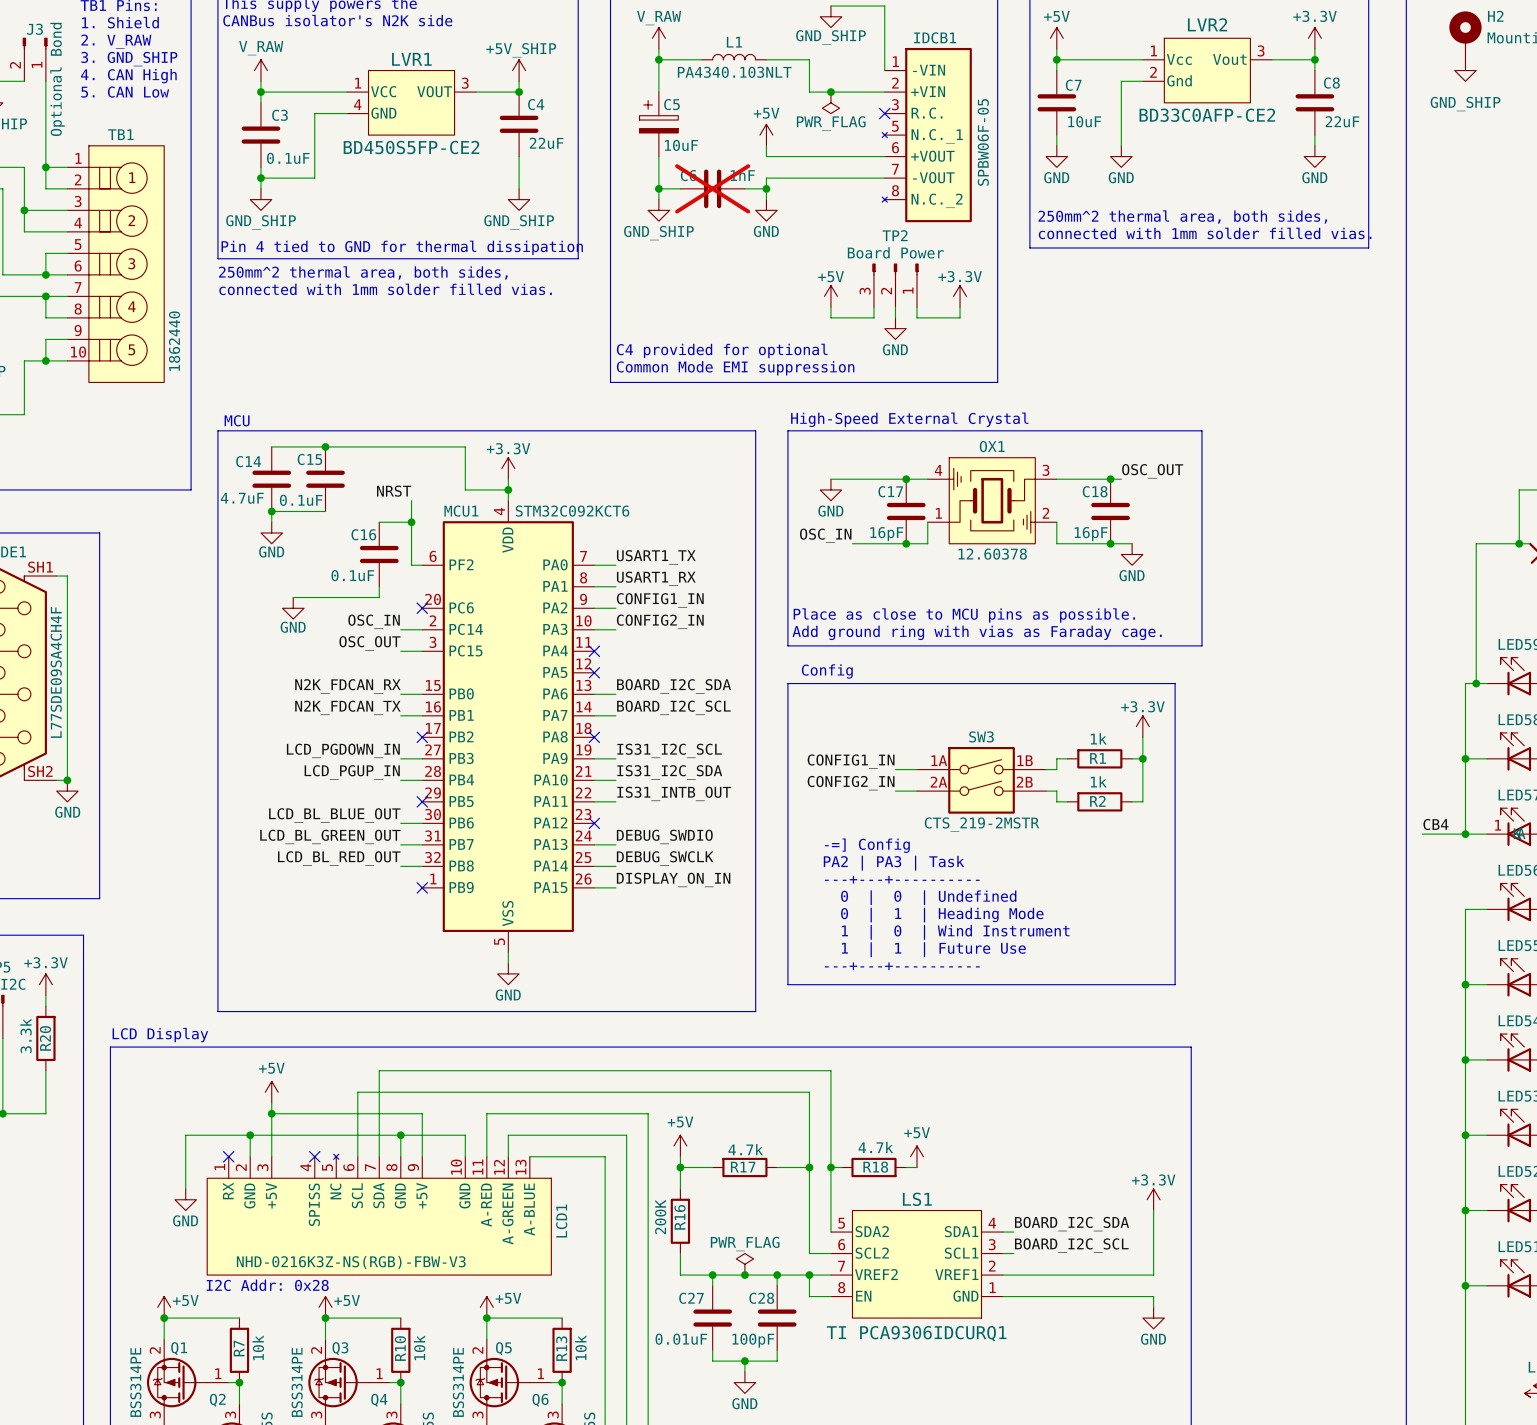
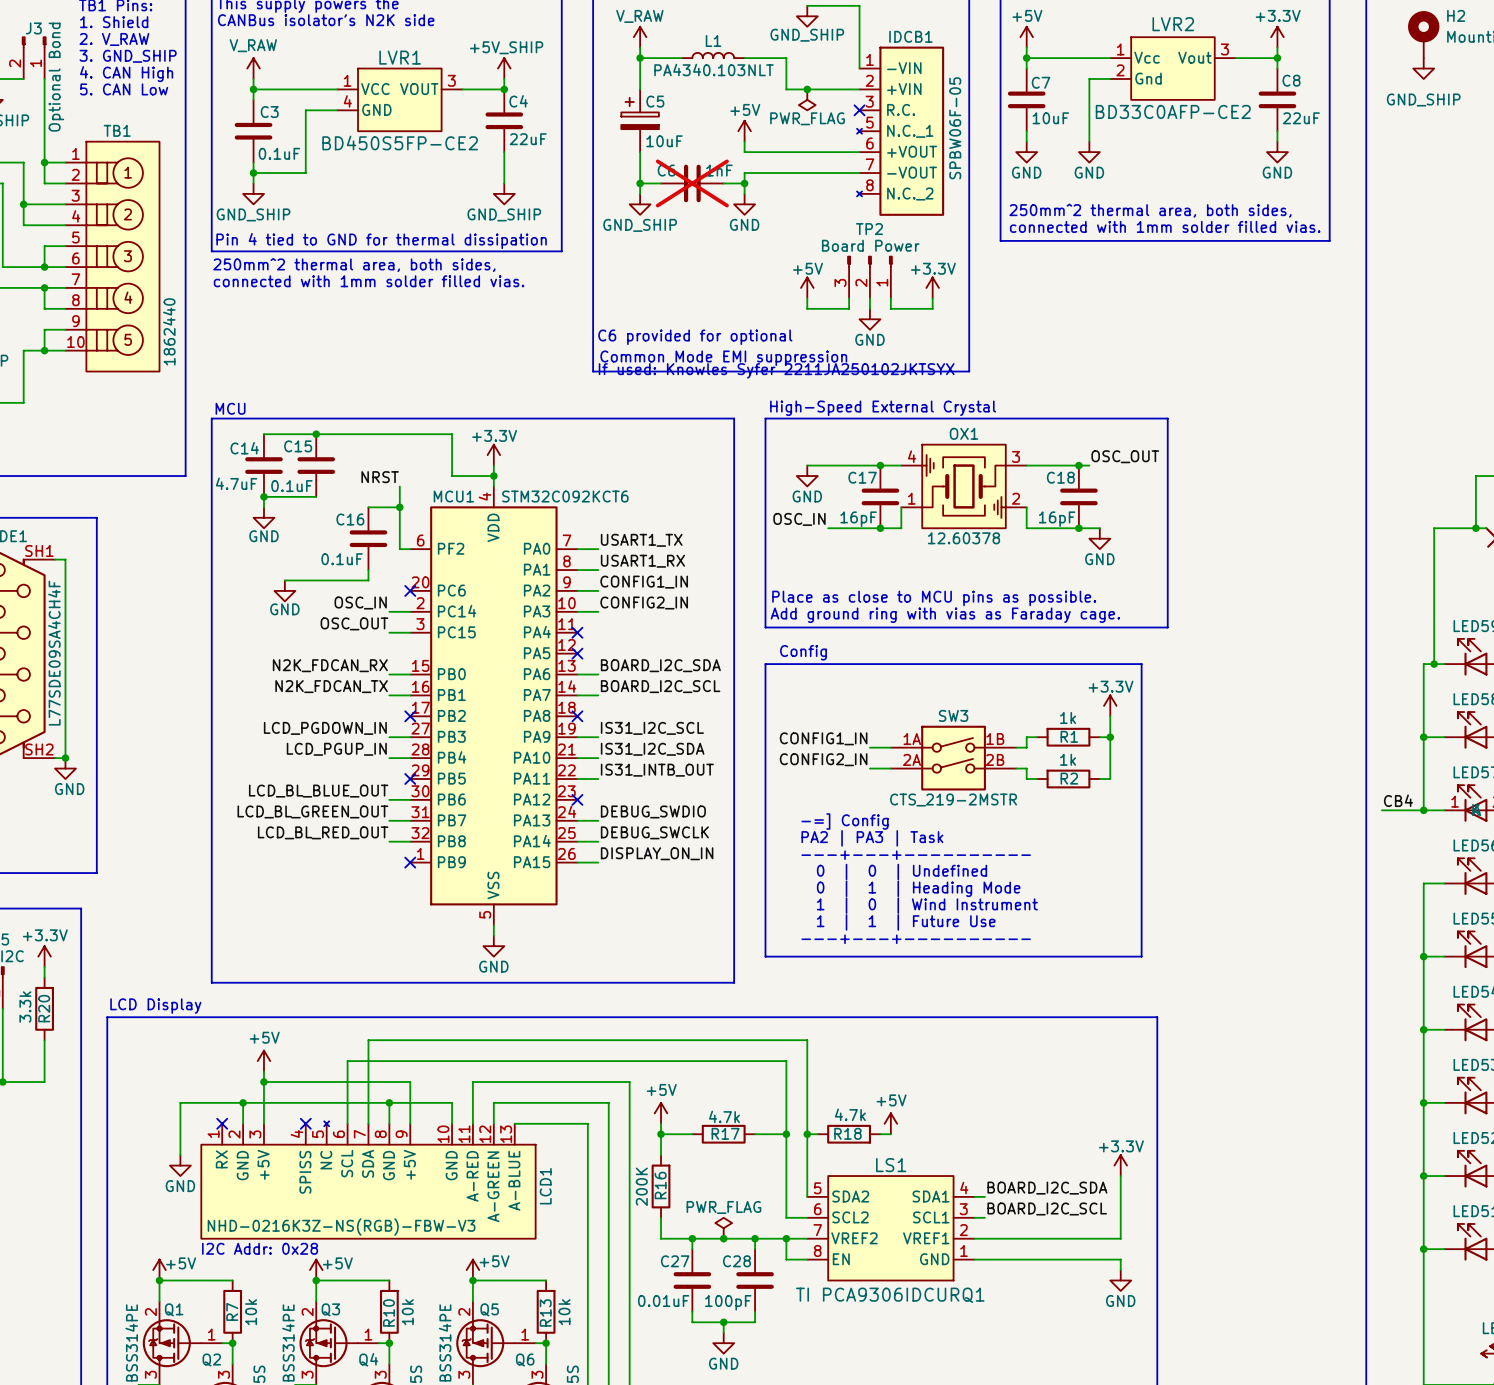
text: C4 provided for optional (722, 350) -> C6 provided for optional (695, 337)
text: none -> If used: Knowles Syfer 2211JA250102JKTSYX (776, 370)

